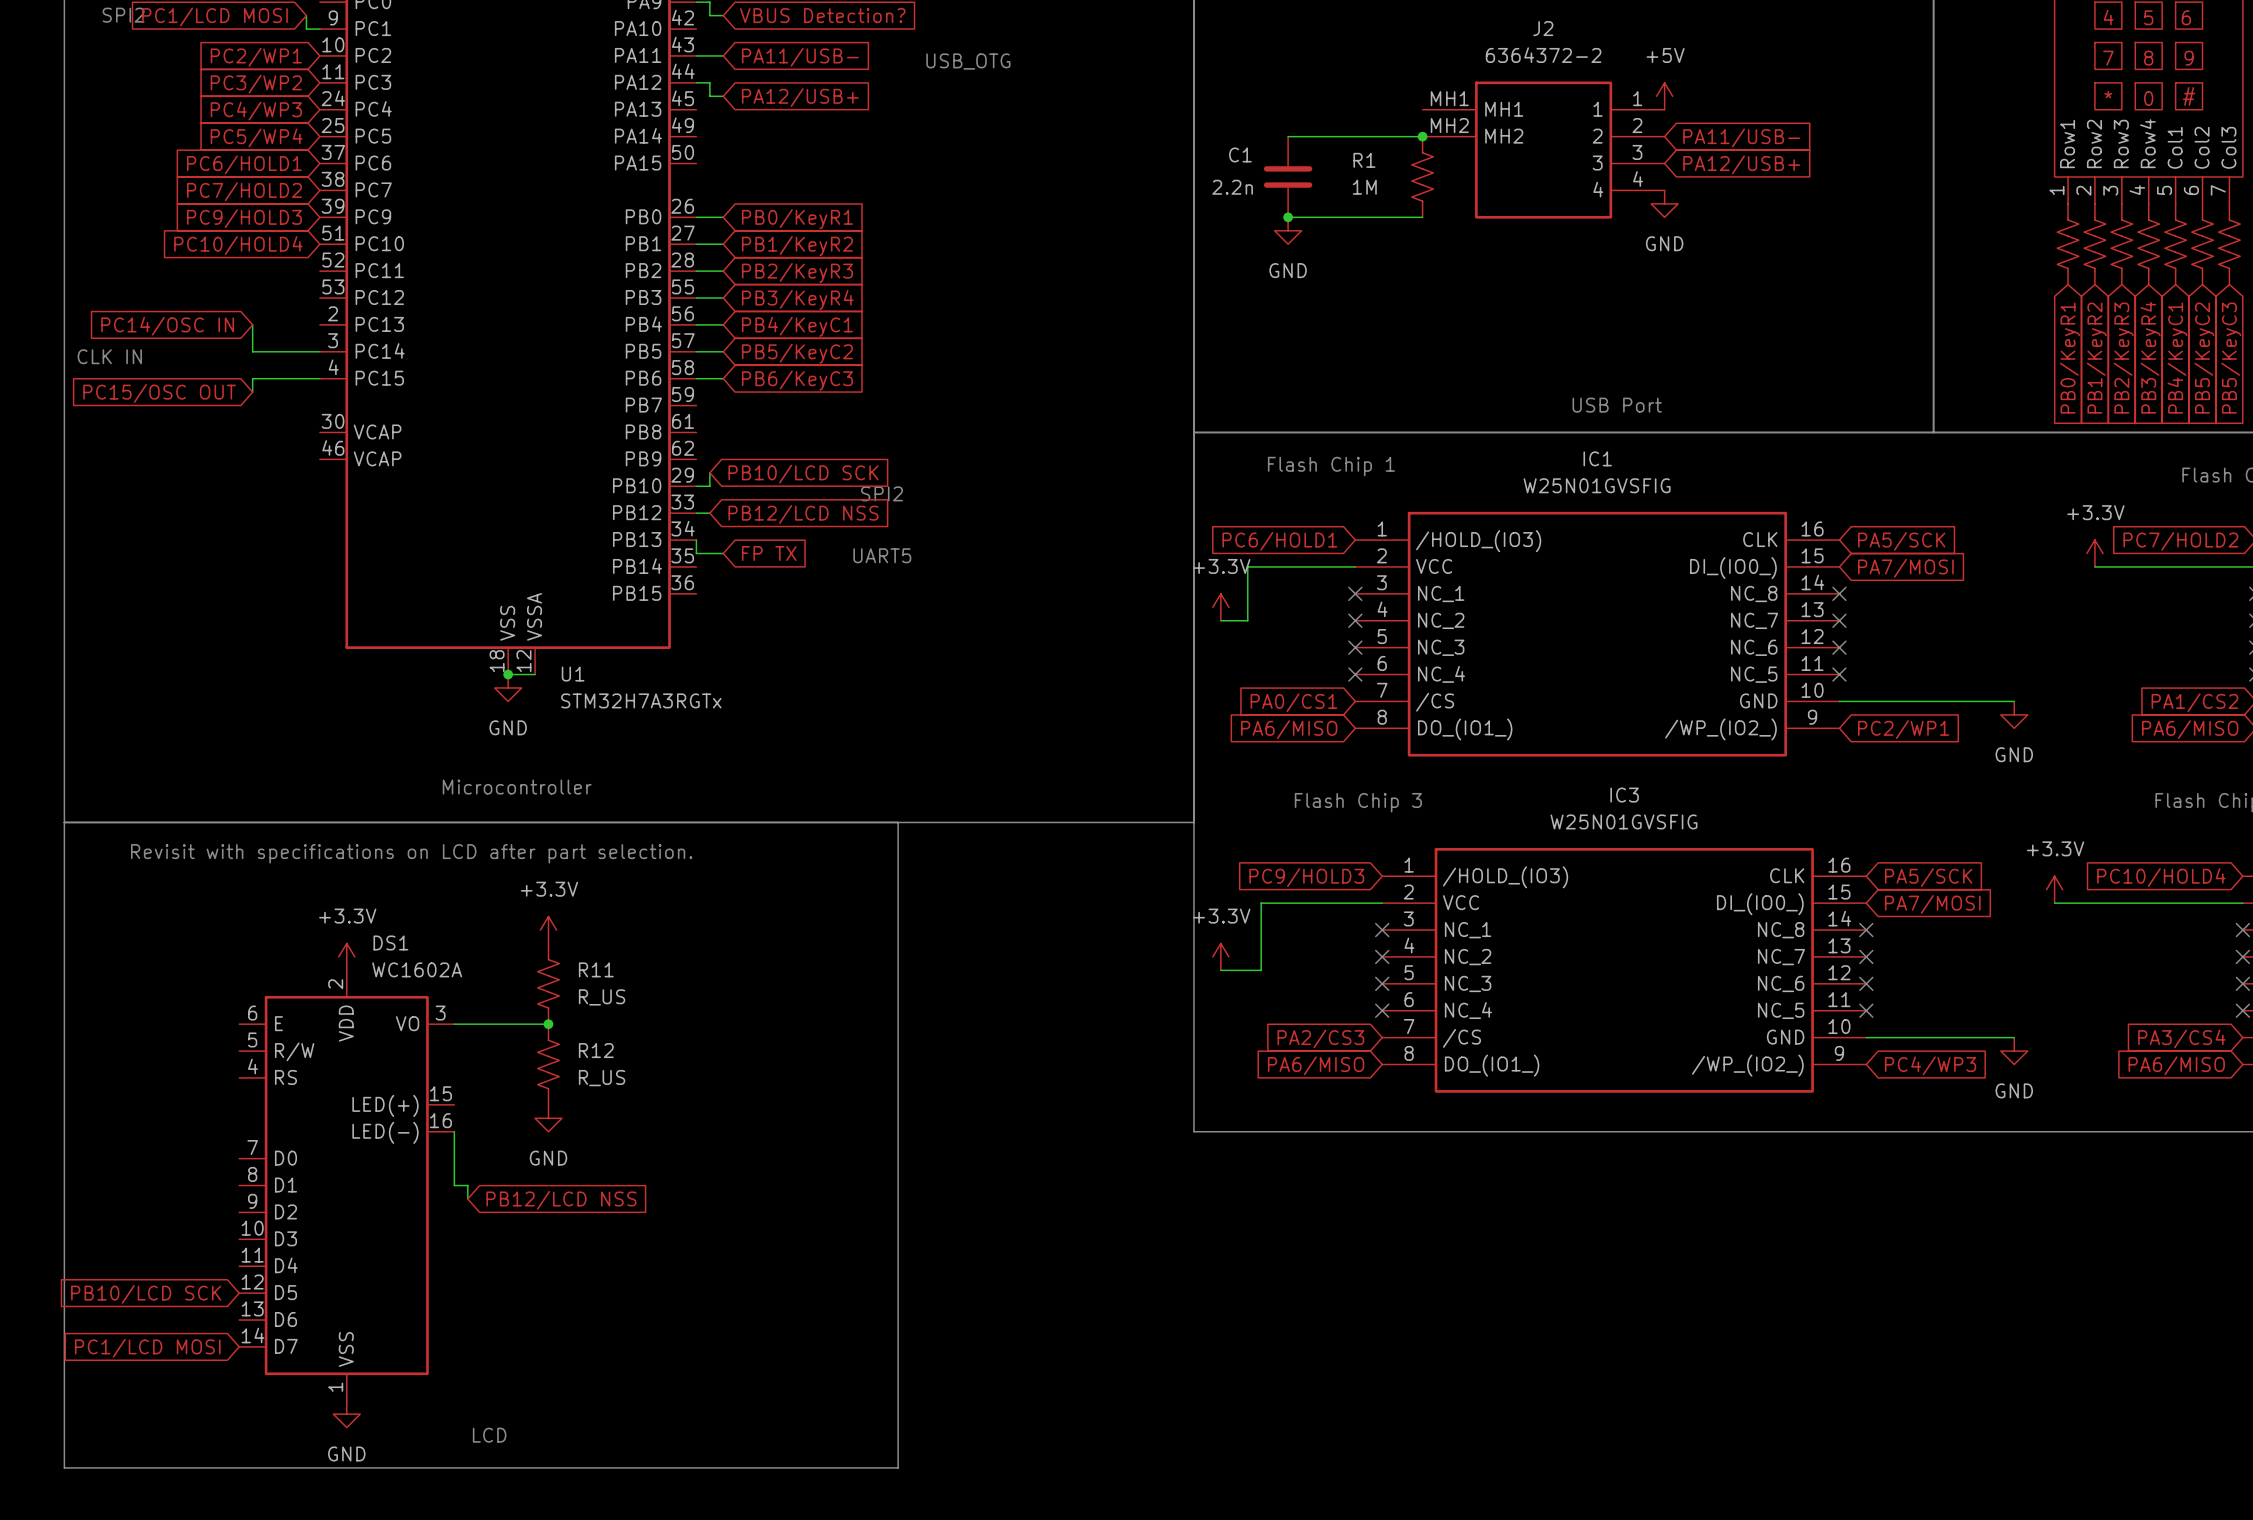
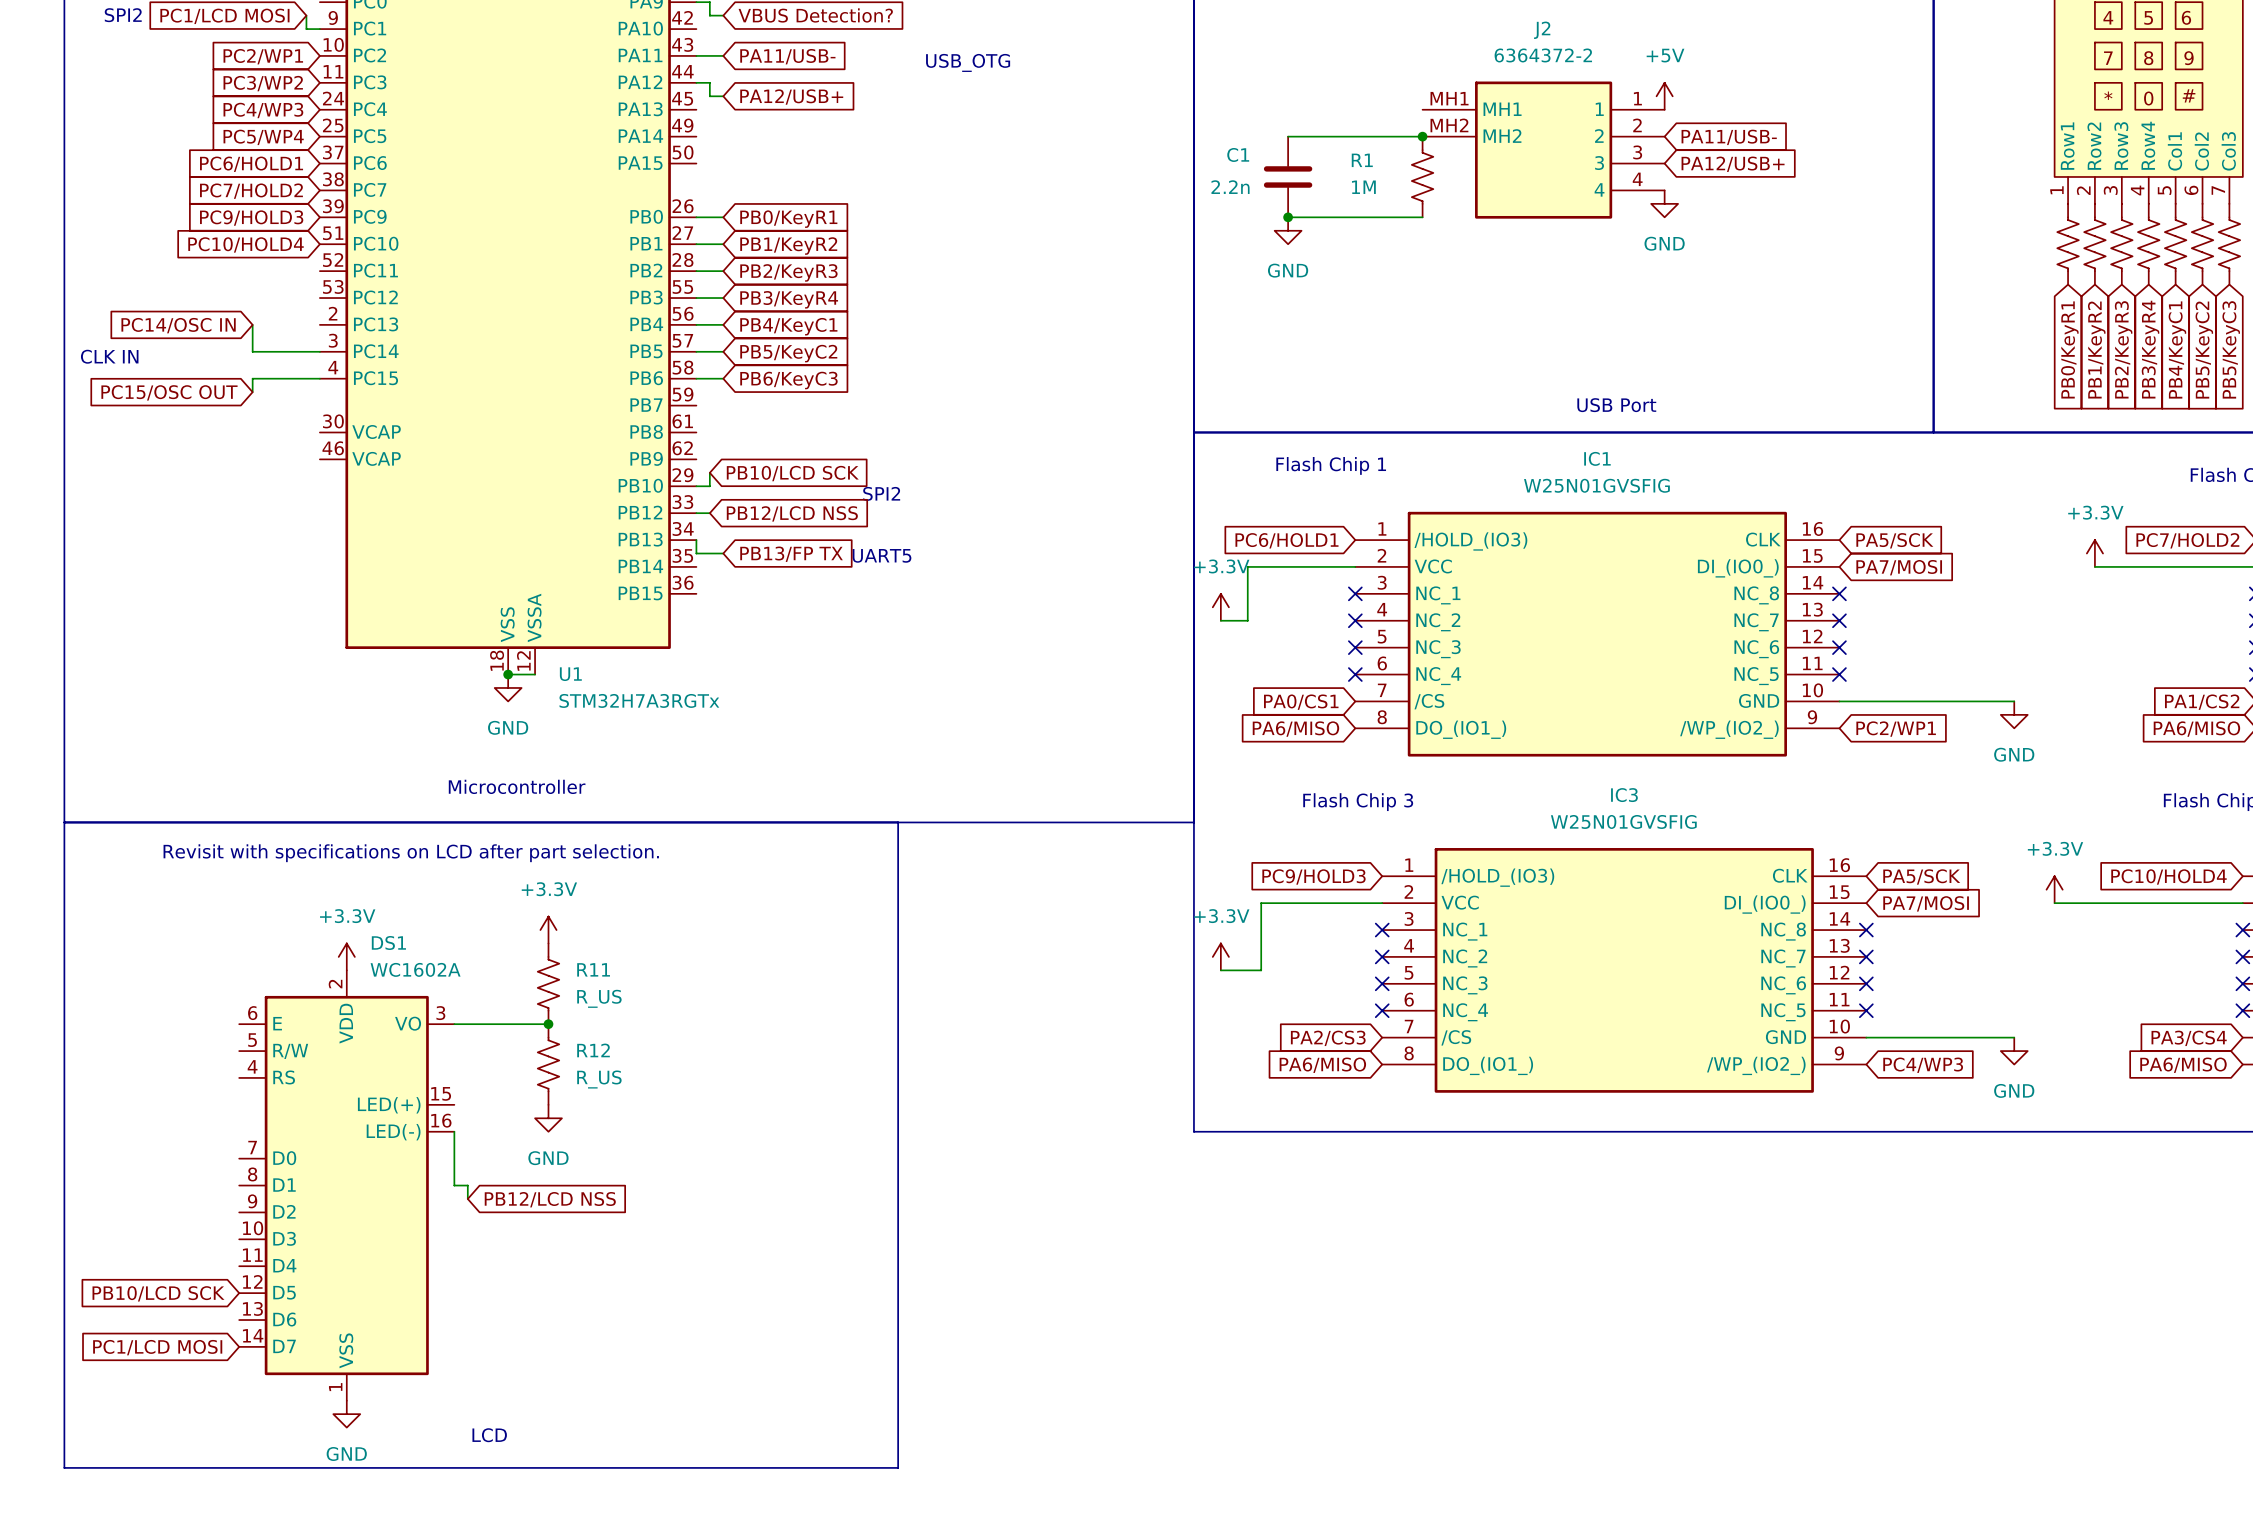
global label: FP TX (769, 553) -> PB13/FP TX (791, 554)

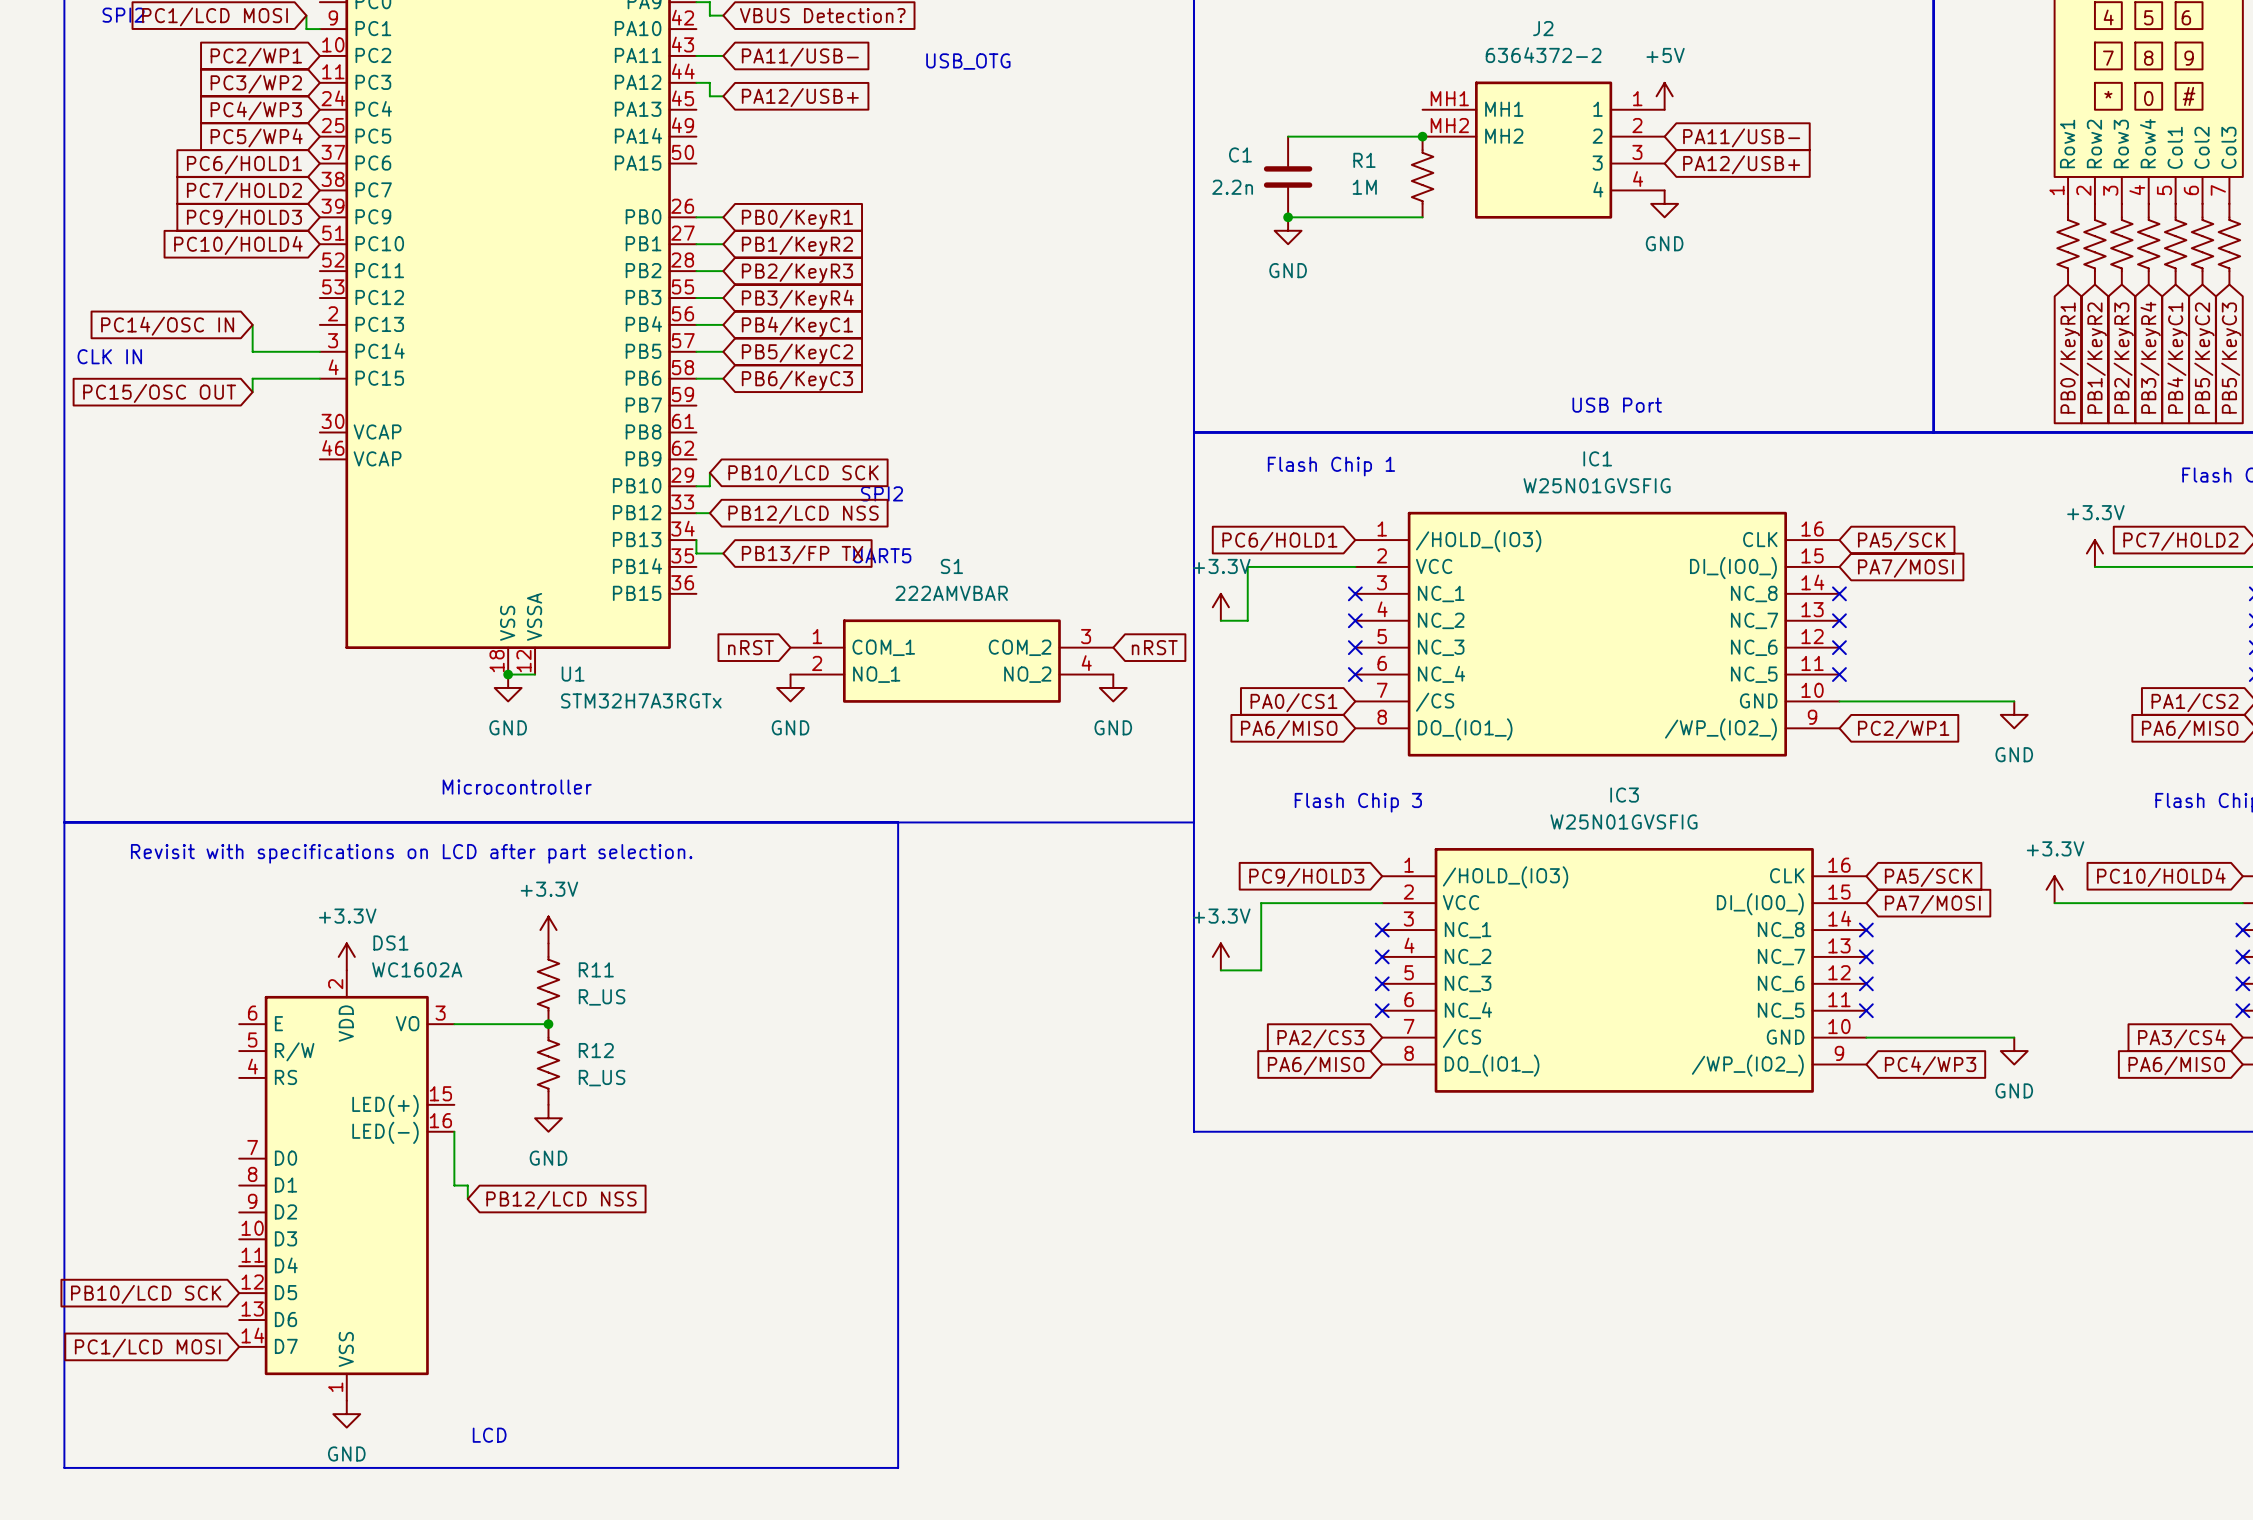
global label: none -> nRST (750, 647)
global label: none -> nRST (1154, 647)
S1: none -> 222AMVBAR (951, 661)
power symbol: none -> GND (790, 687)
power symbol: none -> GND (1113, 687)

